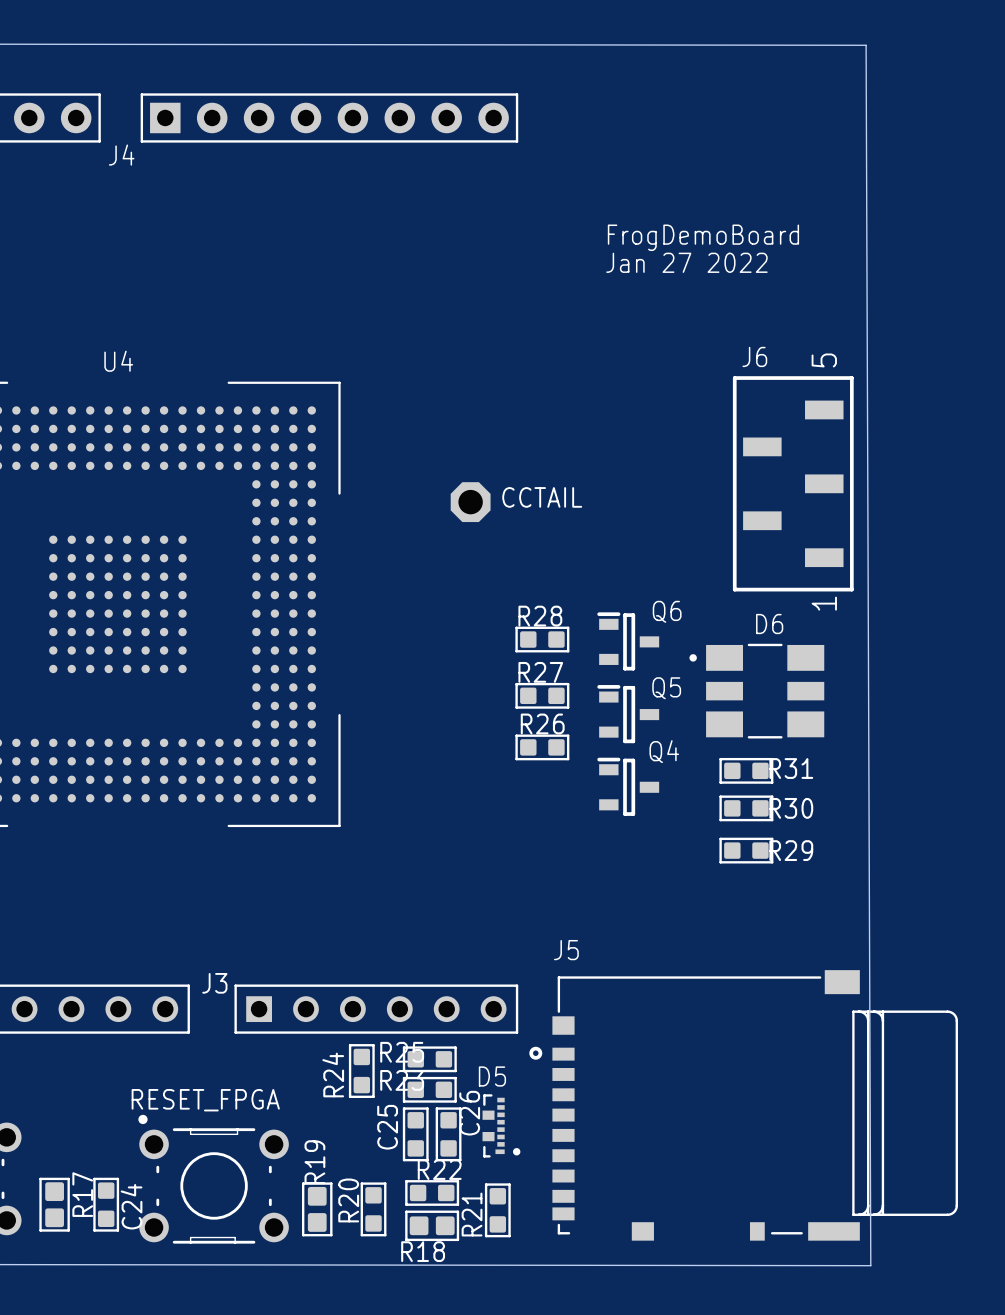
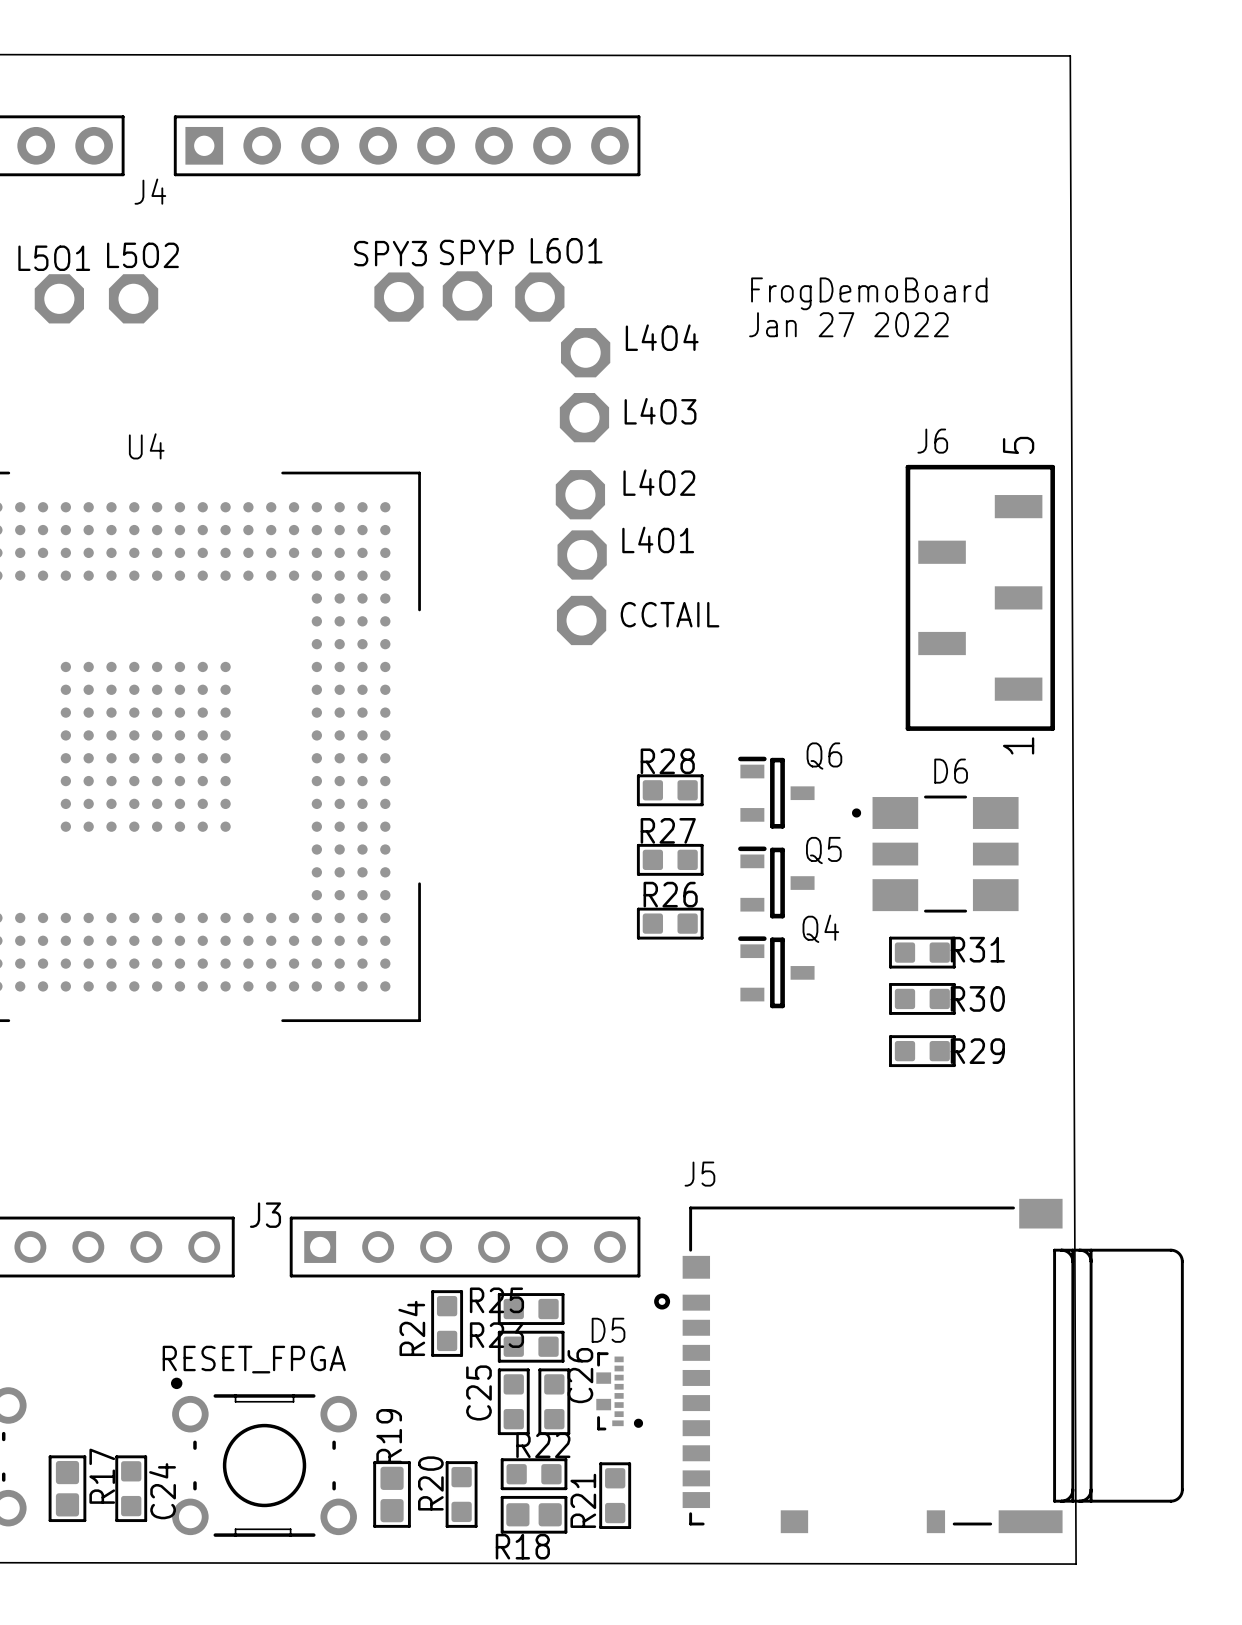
SPYP: none -> (467, 295)
SPY3: none -> (399, 297)
L6O1: none -> (539, 297)
L5O1: none -> (59, 298)
L5O2: none -> (133, 298)
L4O4: none -> (585, 352)
L4O3: none -> (584, 417)
L4O2: none -> (580, 494)
L4O1: none -> (582, 554)

